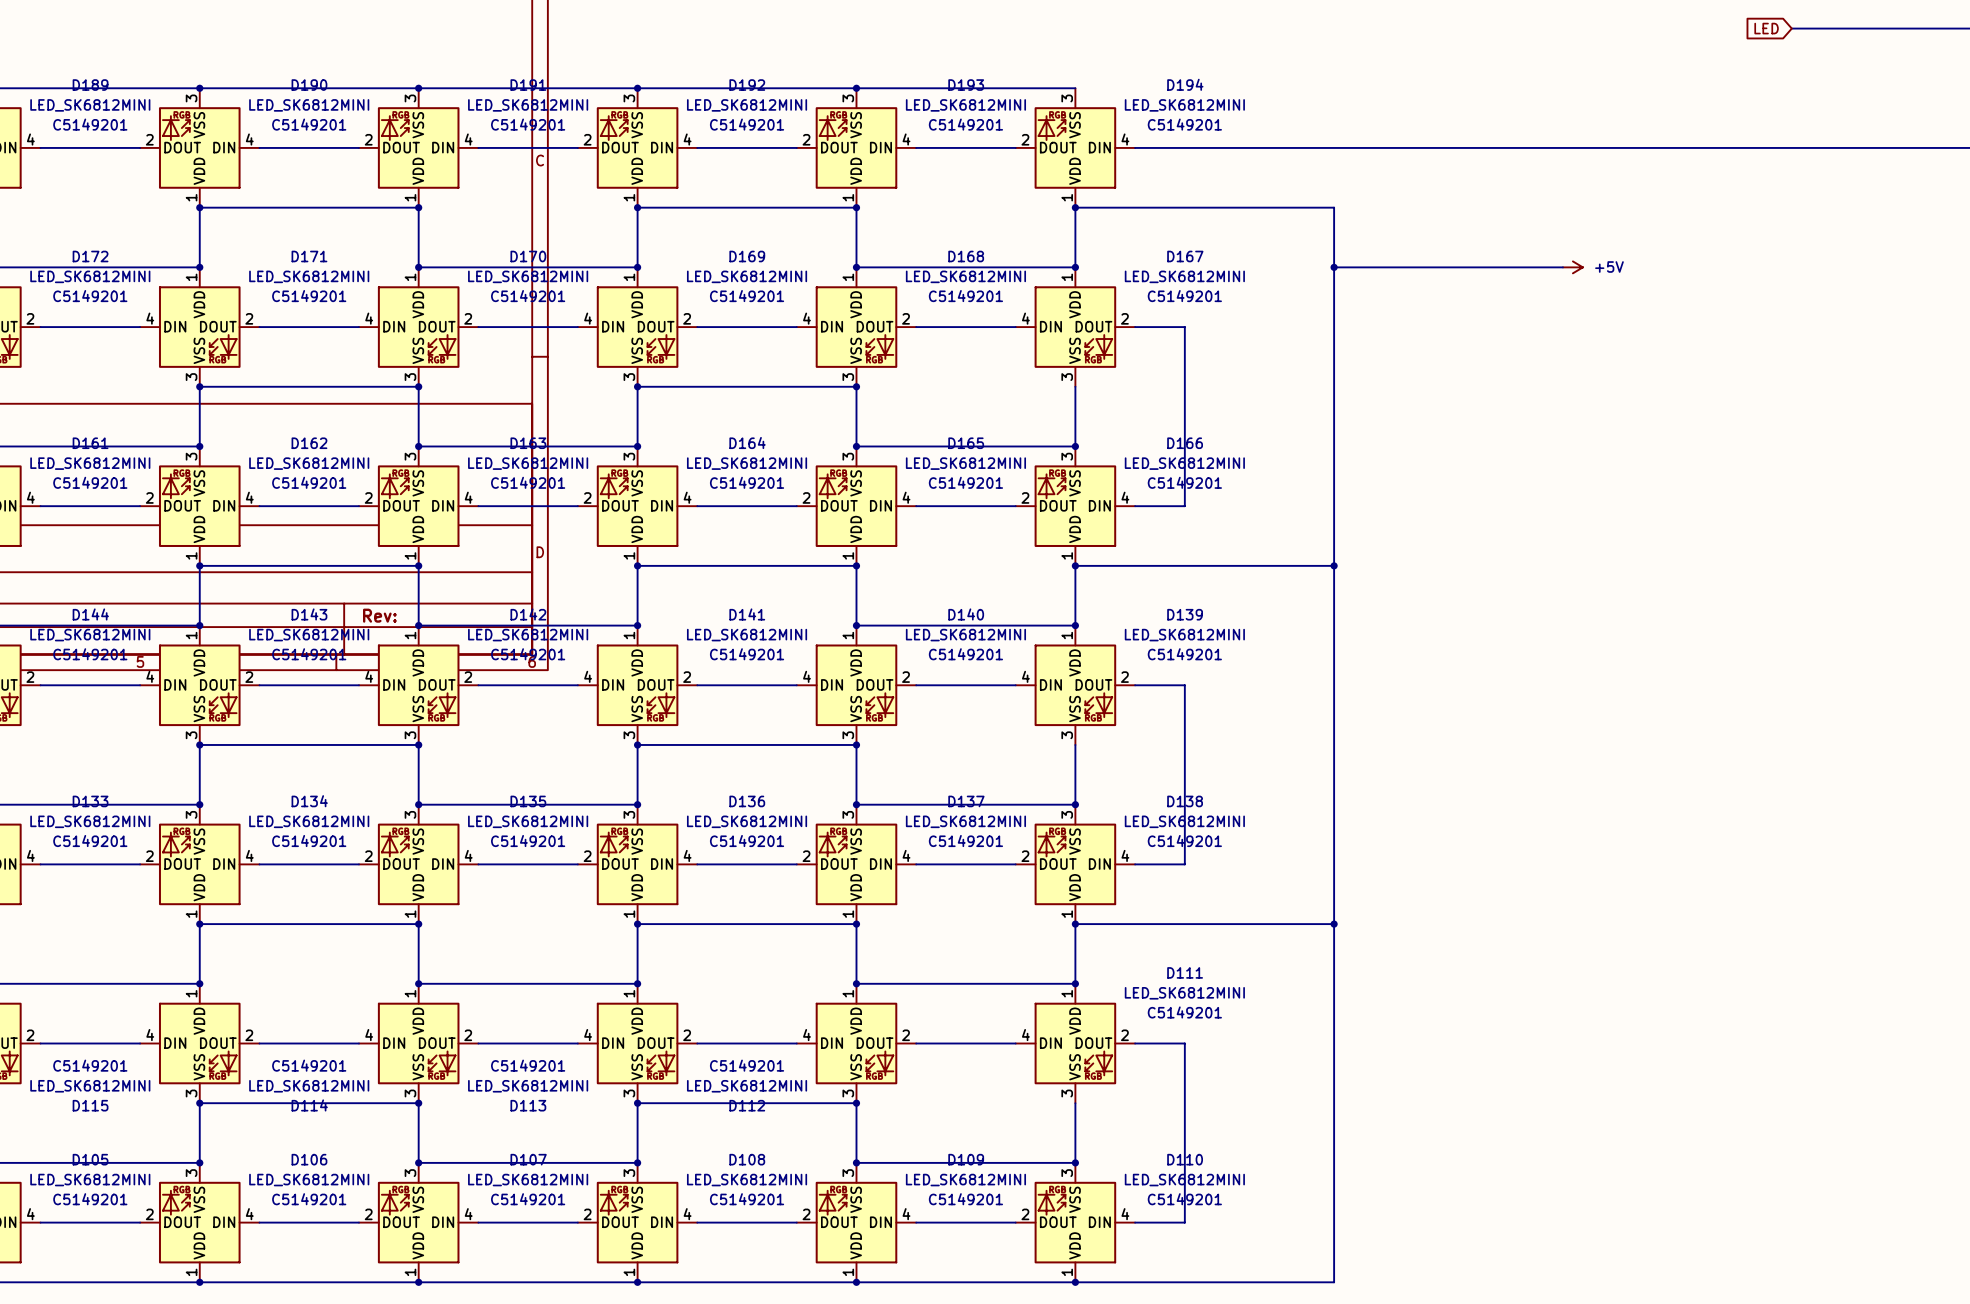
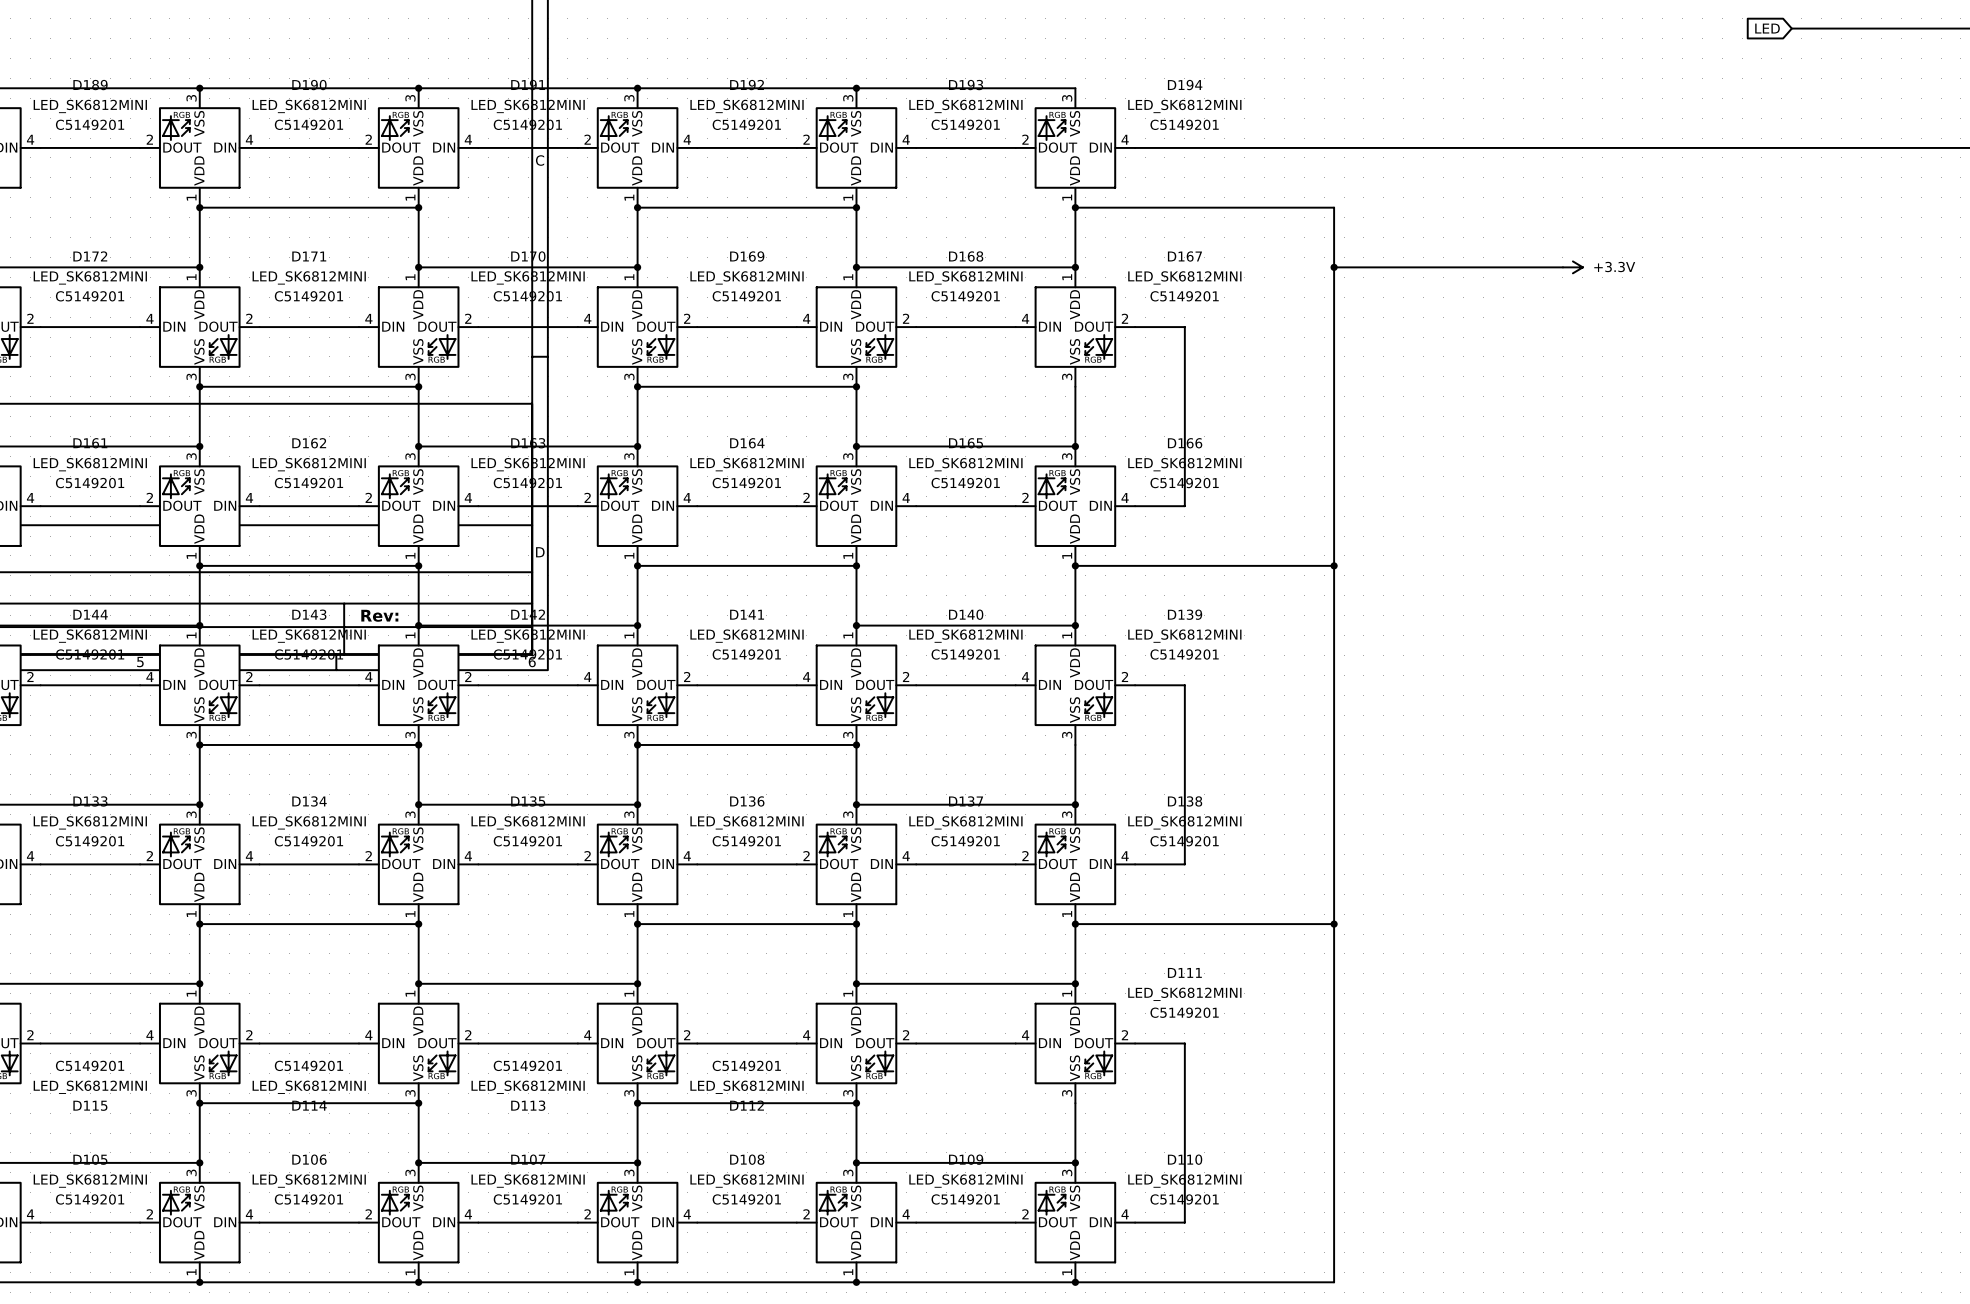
power symbol: +5V (1572, 267) -> +3.3V (1572, 267)

